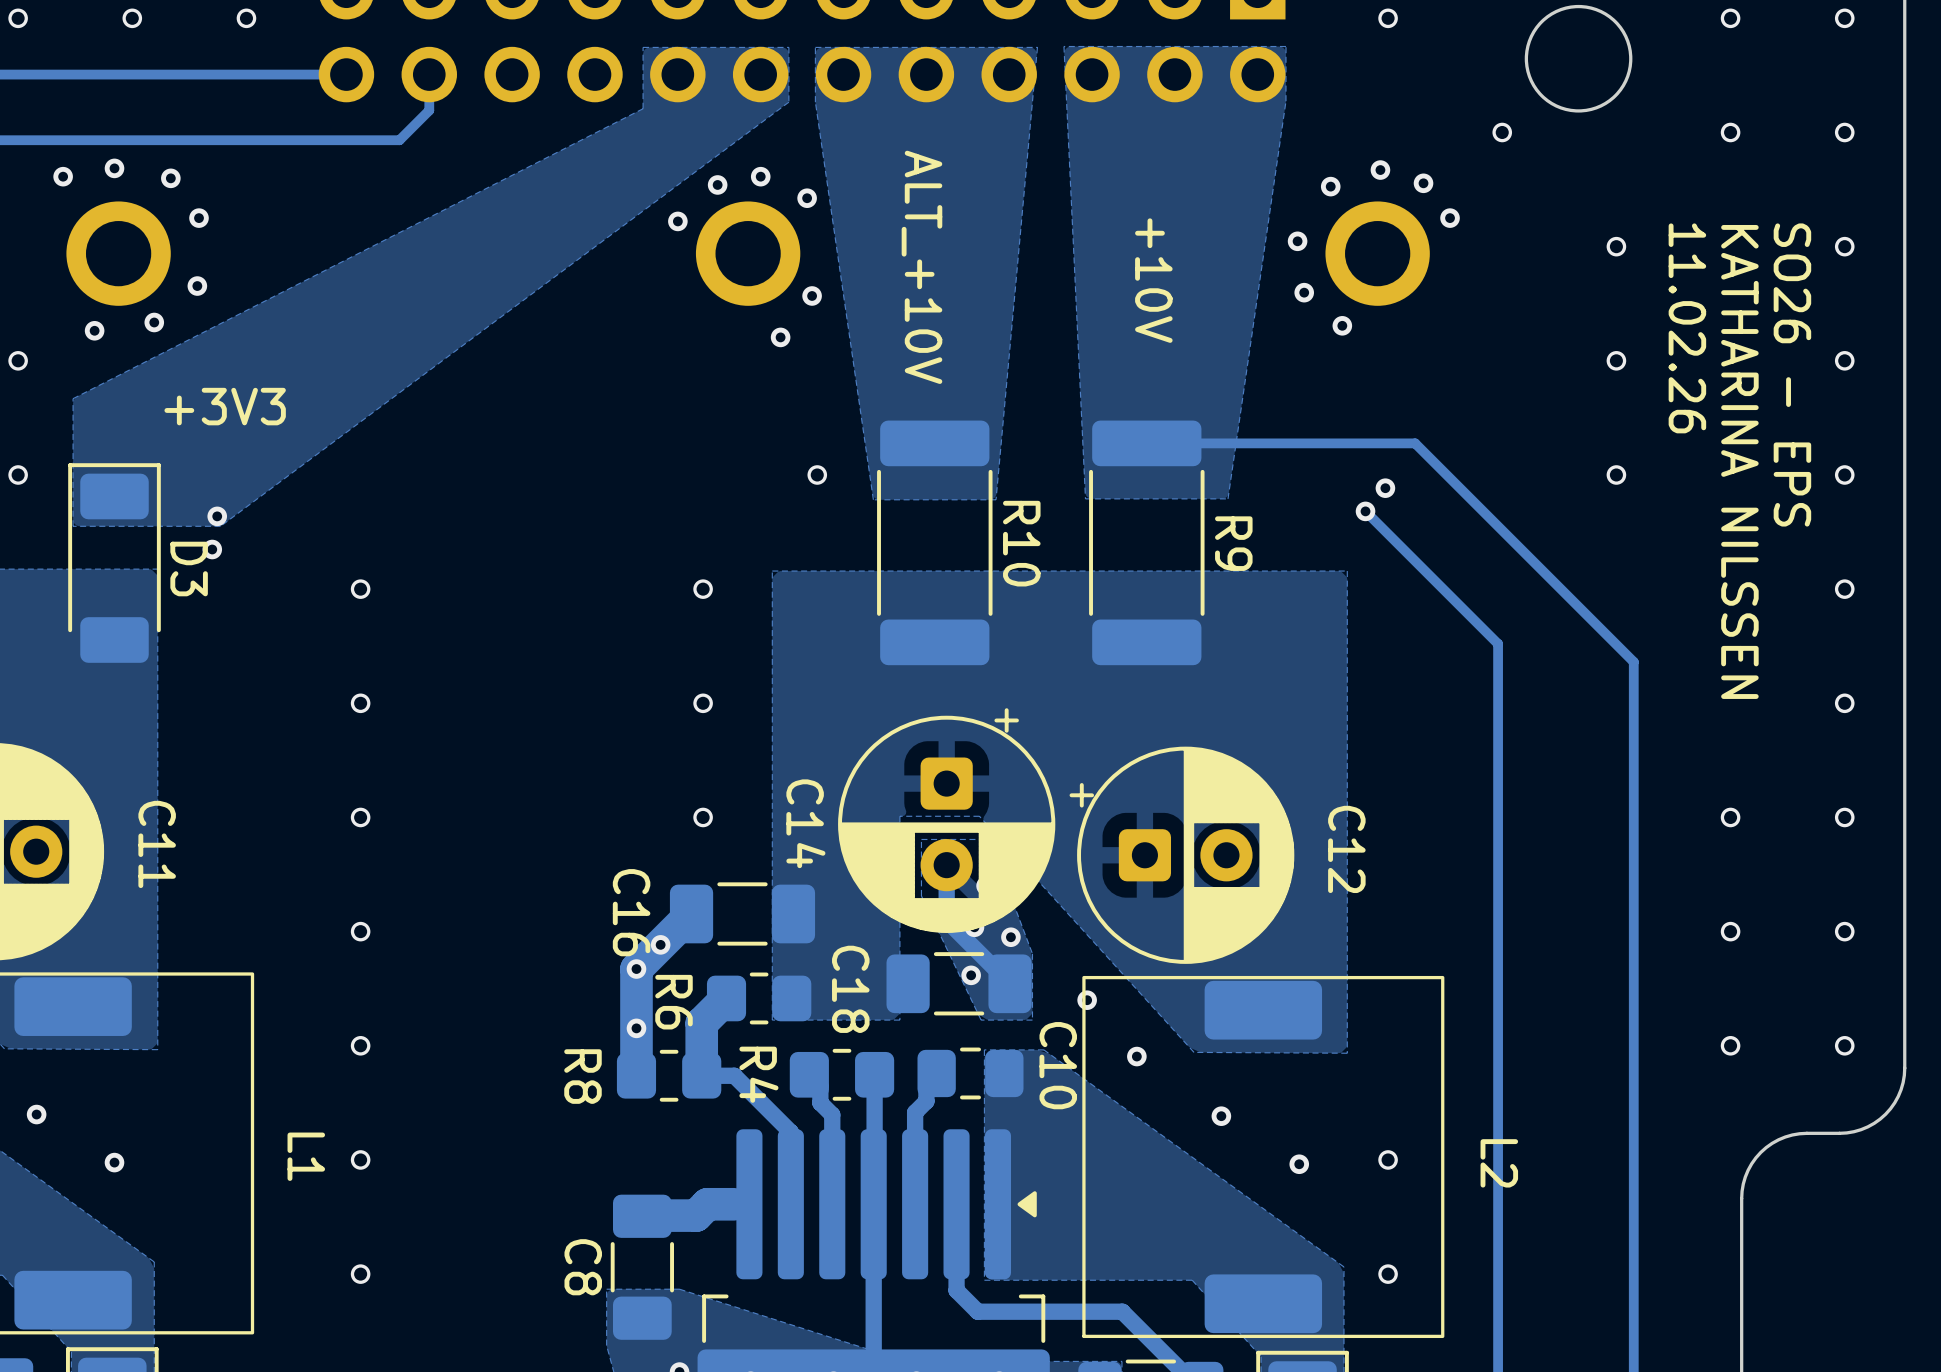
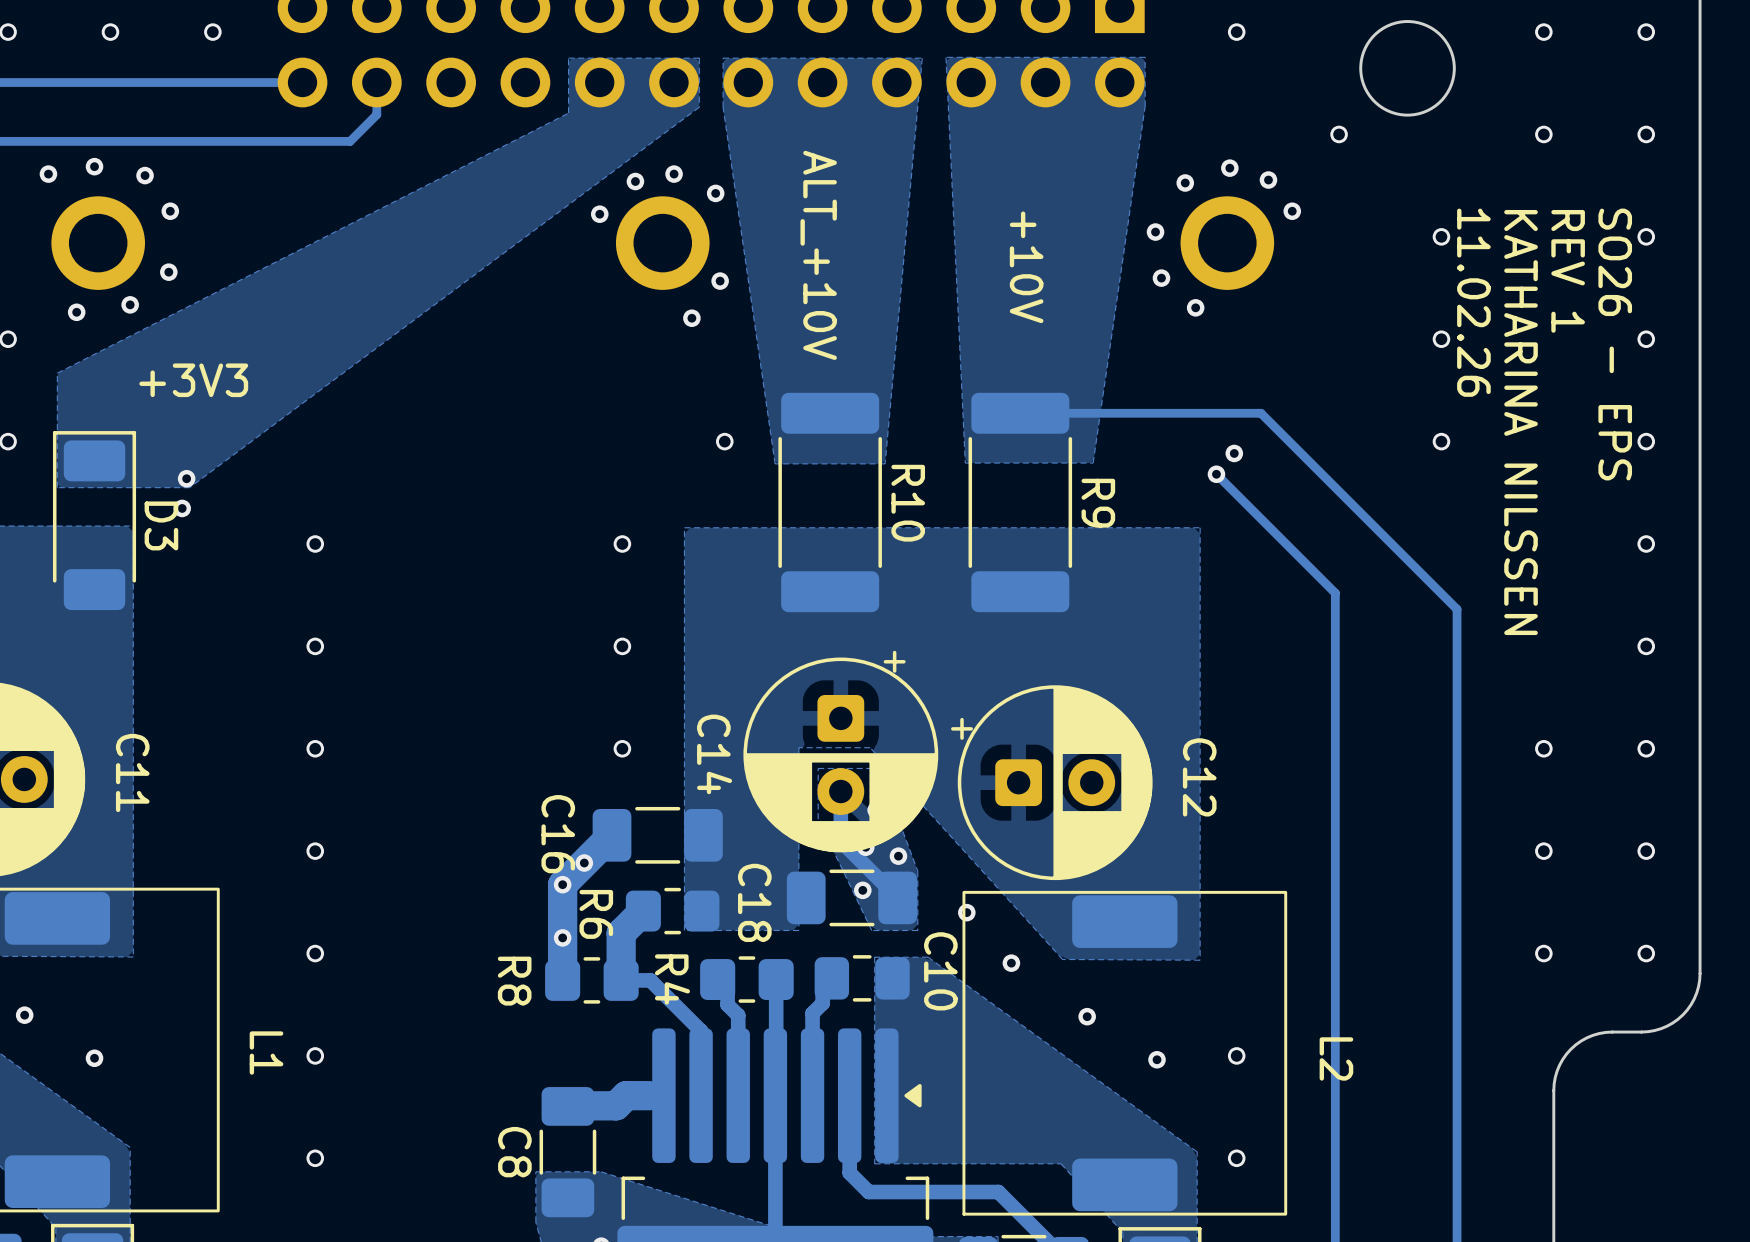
text: none -> REV 1 (1568, 271)
text position: 11.02.26 (1687, 328) -> 11.02.26 (1473, 302)
text position: SO26 - EPS (1792, 374) -> SO26 - EPS (1615, 344)
text position: KATHARINA NILSSEN (1739, 461) -> KATHARINA NILSSEN (1521, 422)

